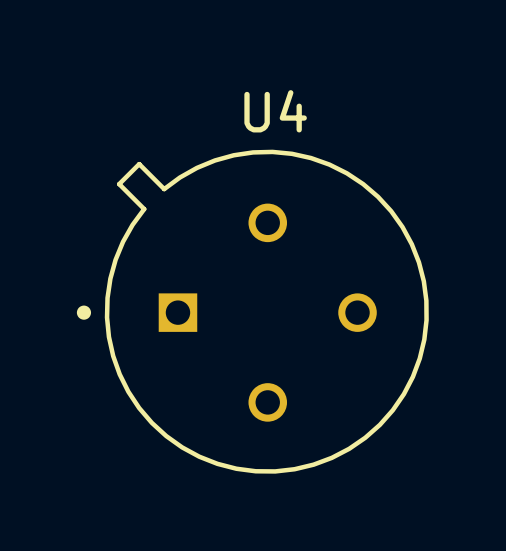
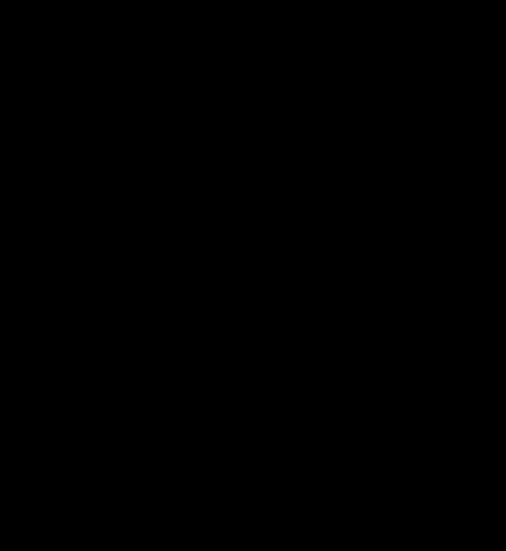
U4: (252, 311) -> none

